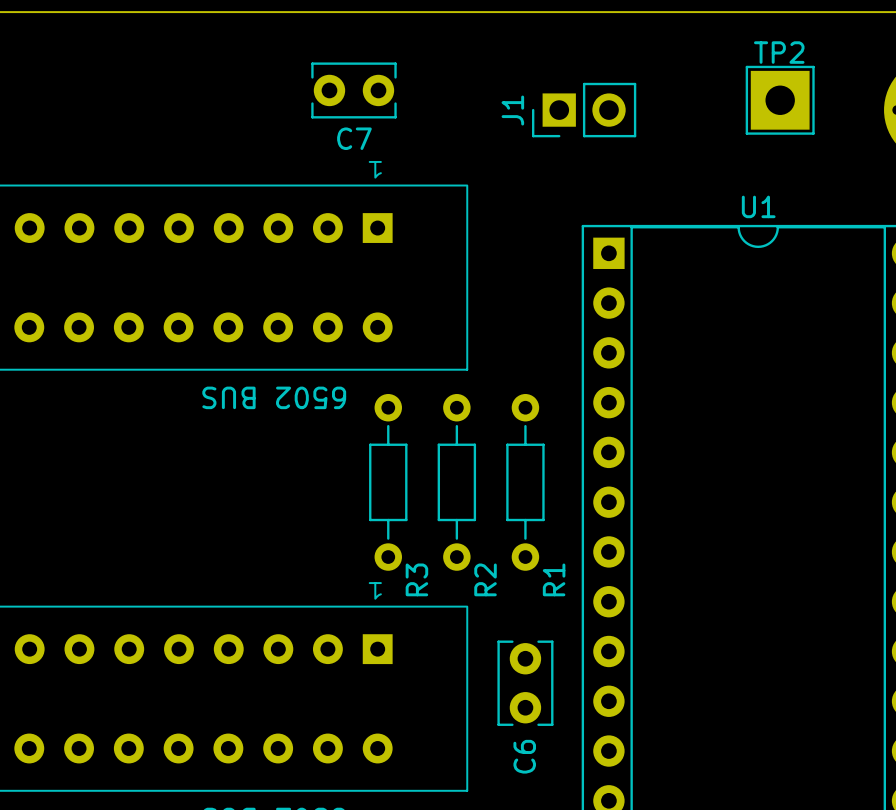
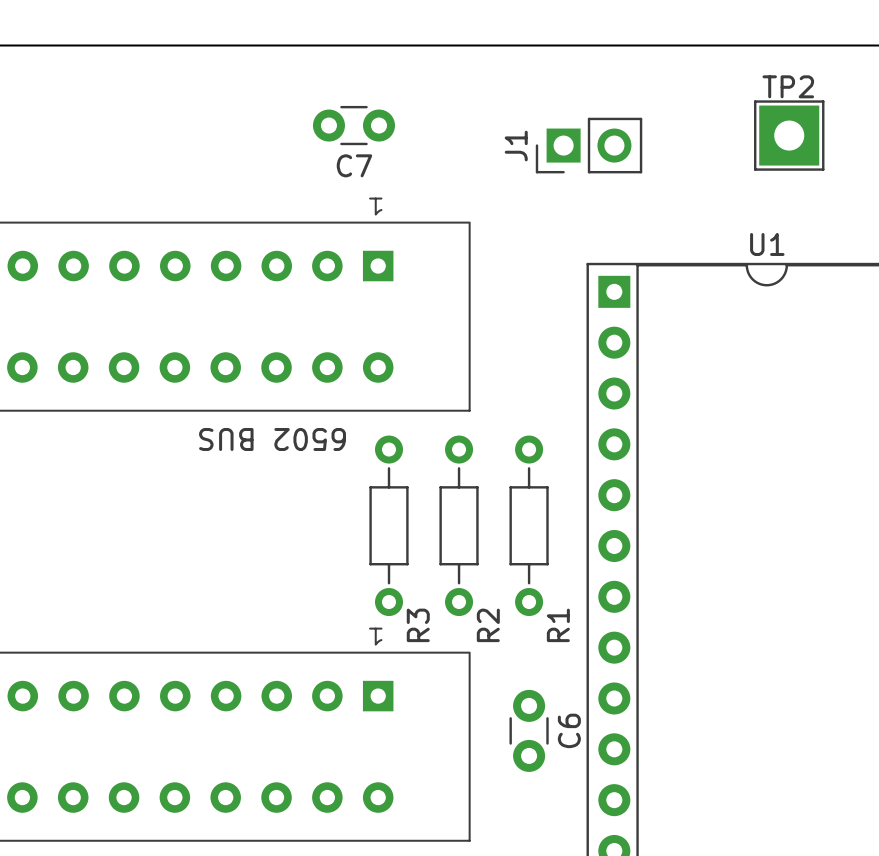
C7 footprint: [311, 62, 397, 119] -> [312, 105, 396, 146]
C6 footprint: [497, 640, 554, 726] -> [509, 689, 549, 772]
C6 name position: C6 (524, 756) -> C6 (569, 730)

